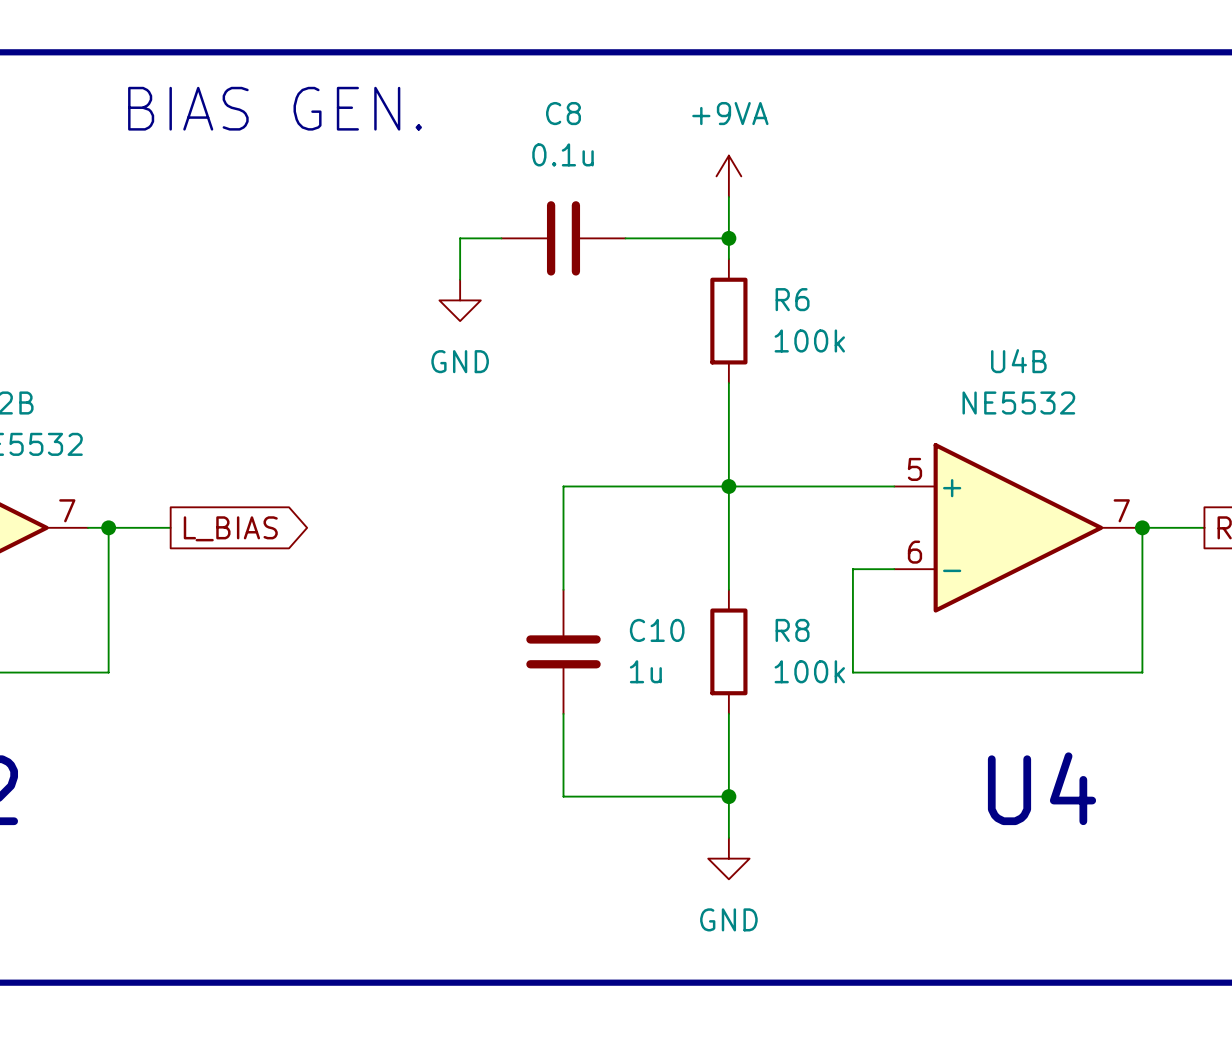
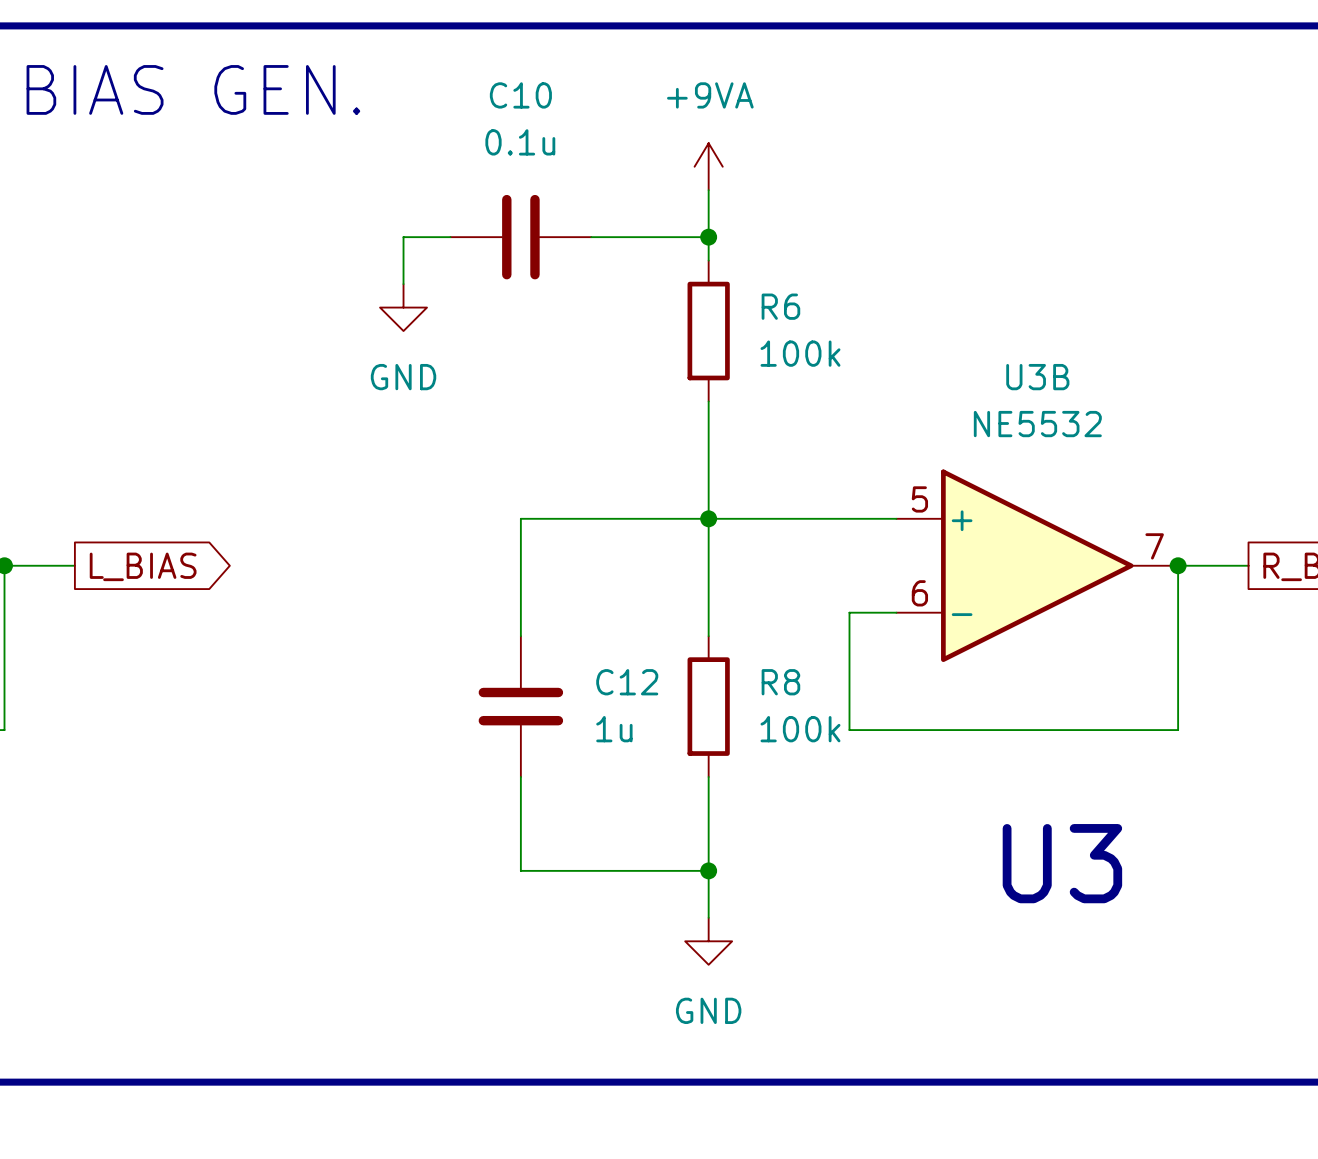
C8 name: C8 (563, 113) -> C10 (520, 95)
U4B name: U4B (1018, 361) -> U3B (1037, 377)
C10 name: C10 (657, 630) -> C12 (627, 682)
text: U4 (1041, 788) -> U3 (1062, 863)

